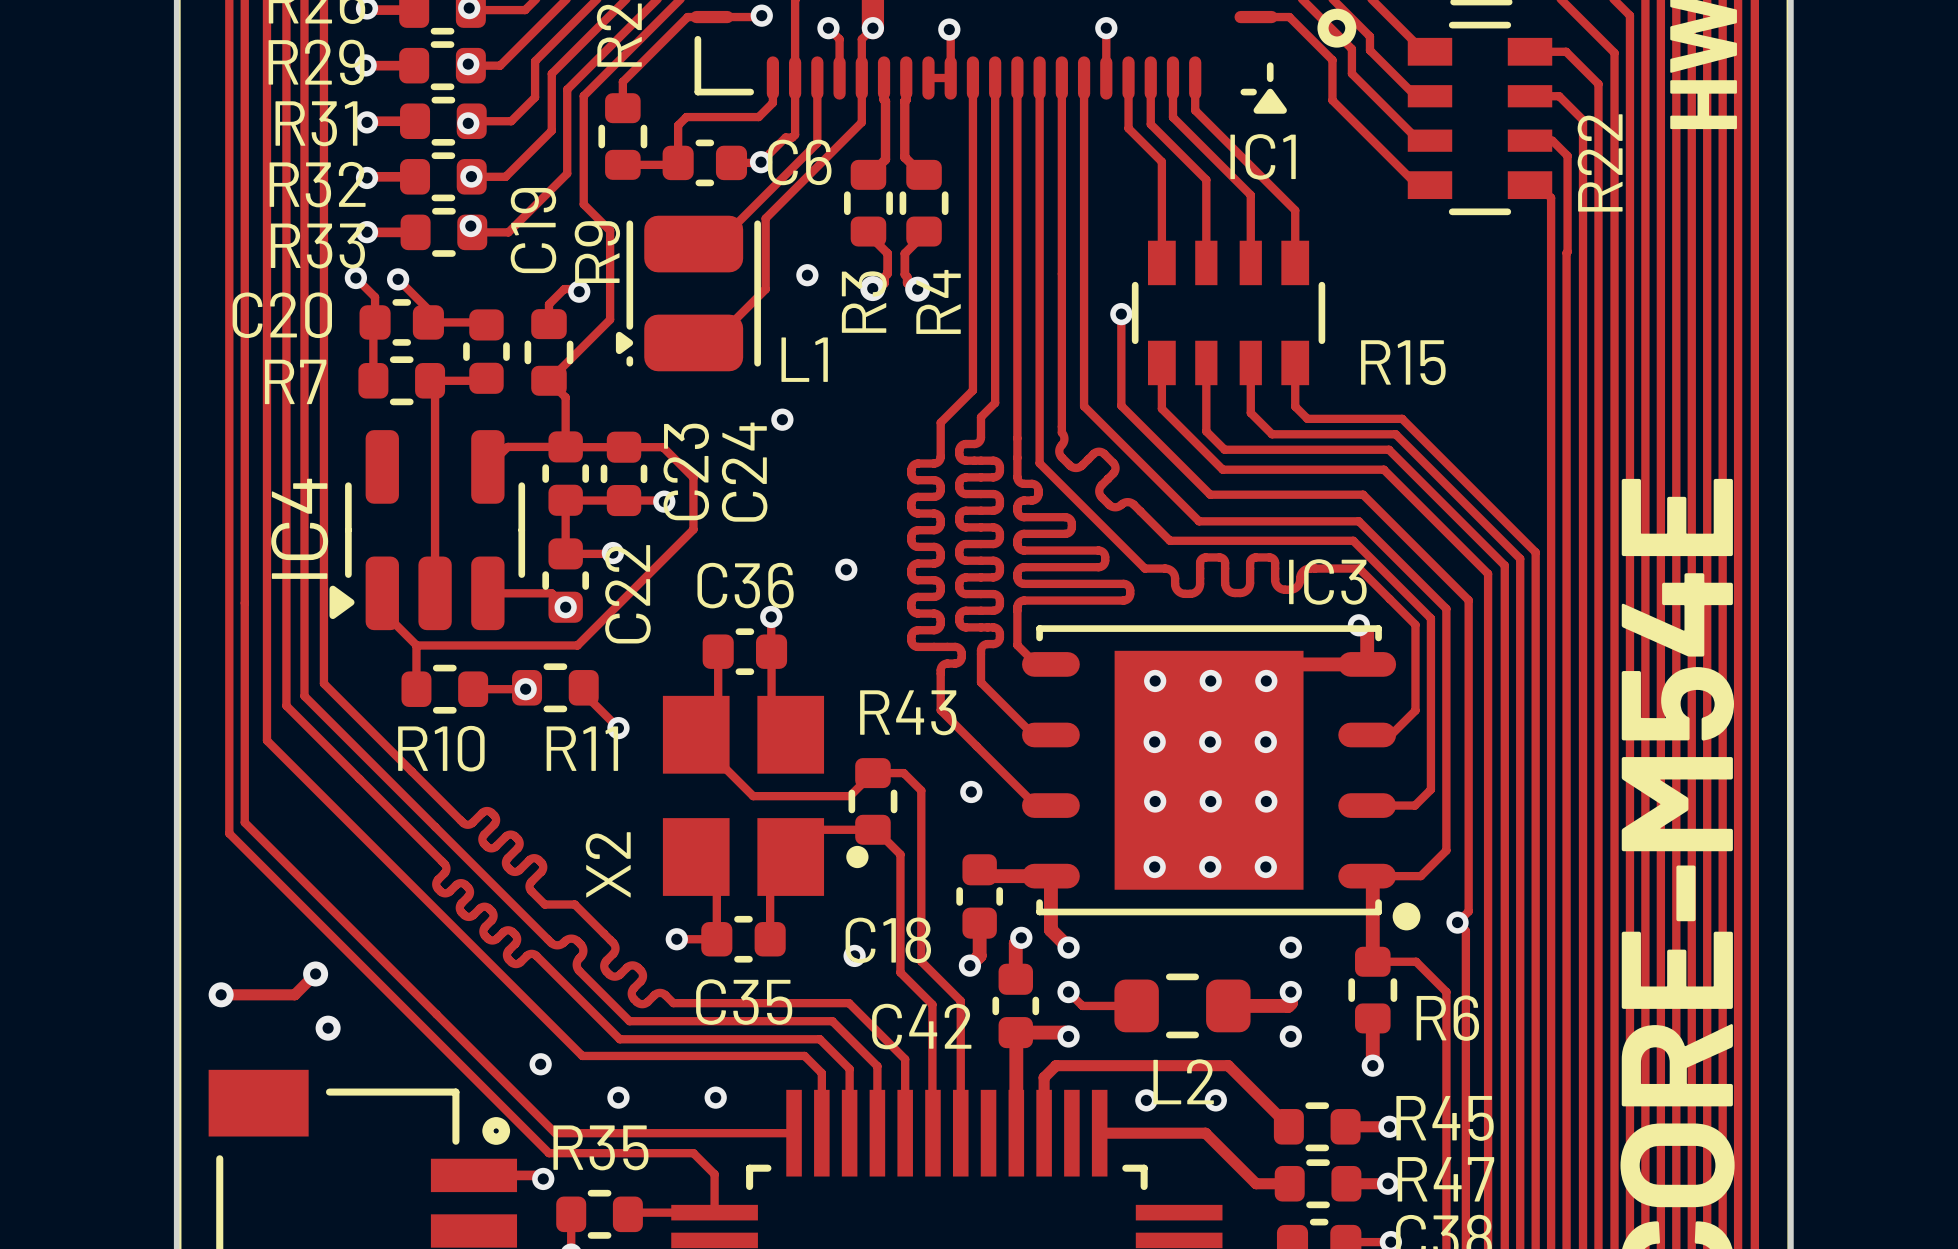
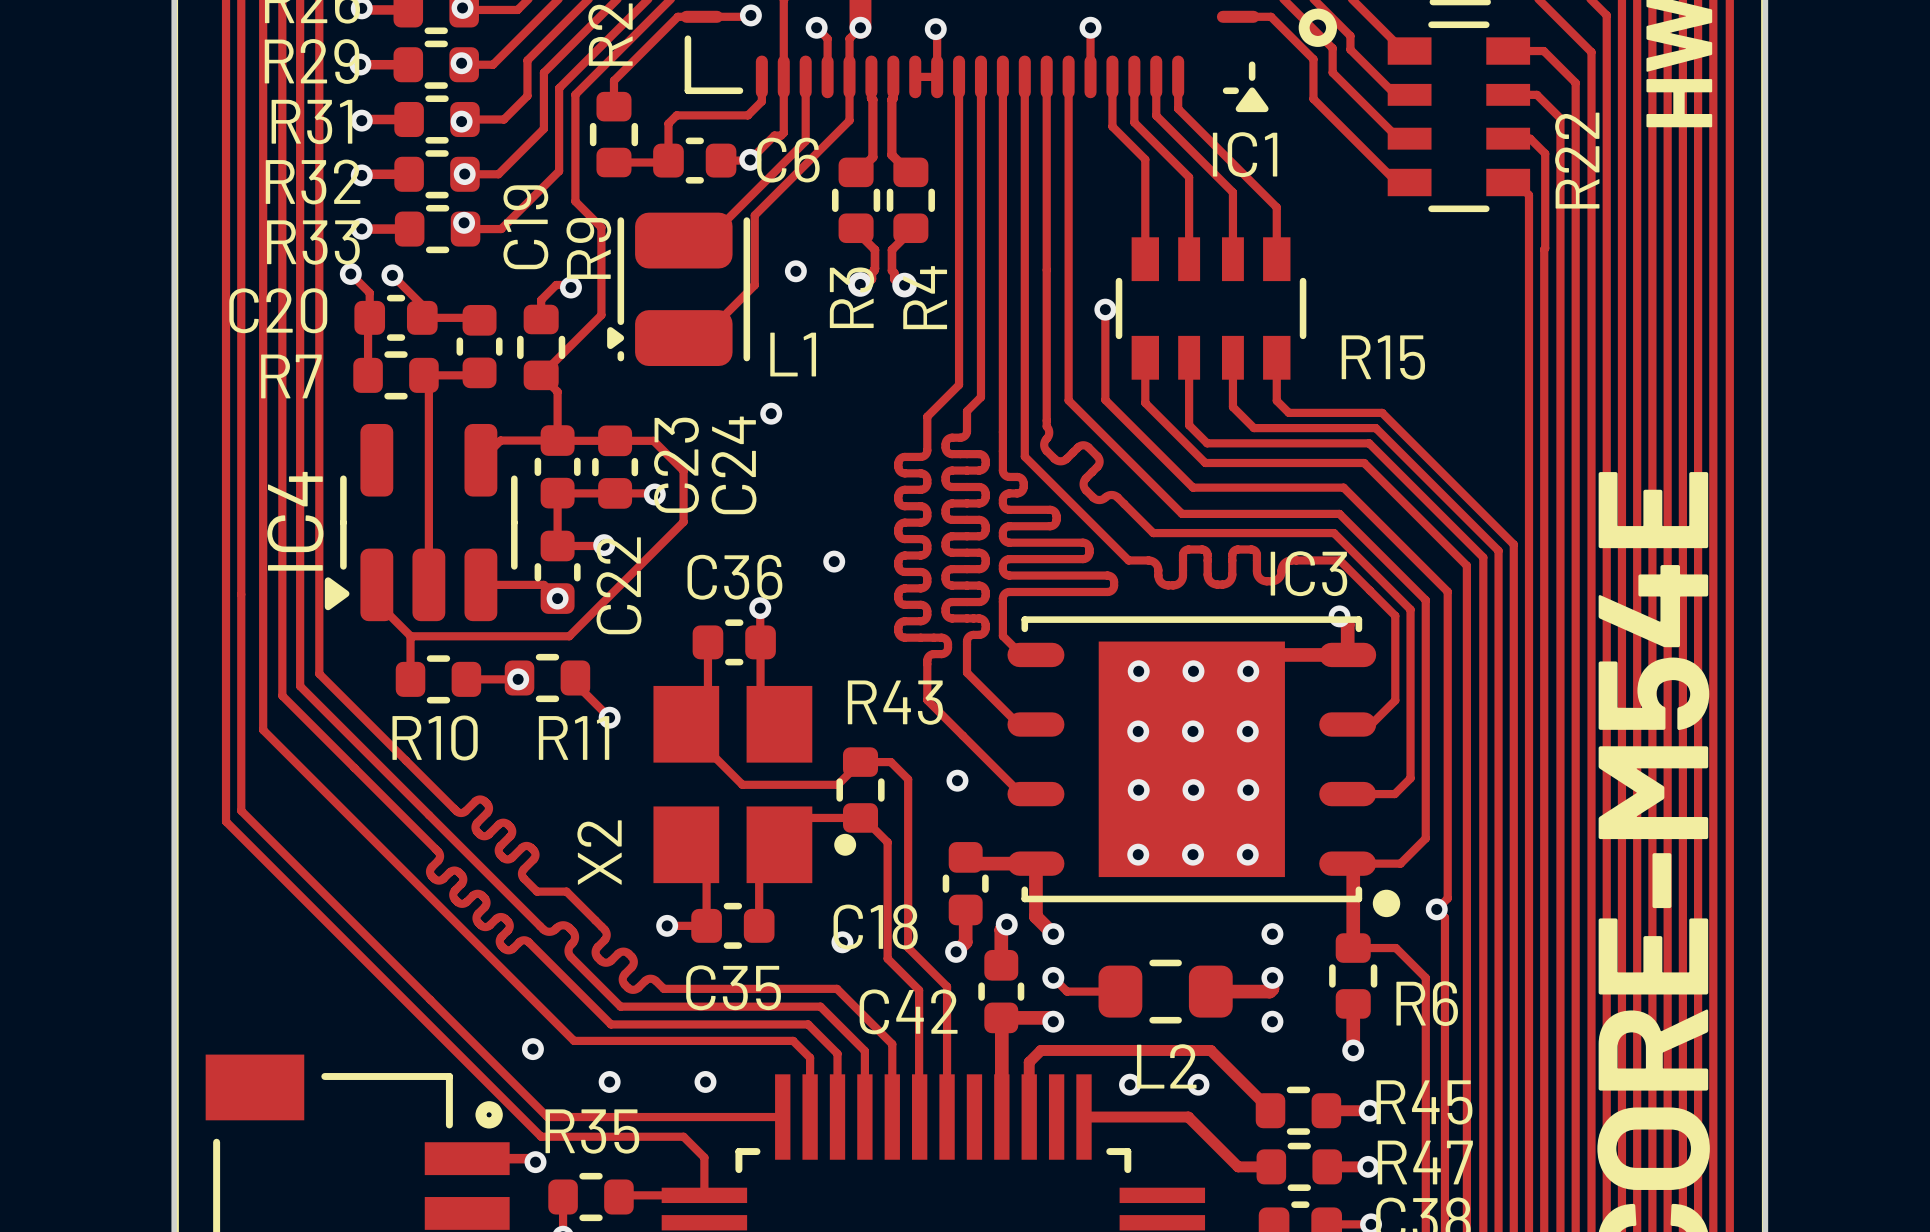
track: (315, 973) (294, 994) (221, 994) -> none
via: (315, 973) -> none
via: (221, 994) -> none
via: (328, 1028) -> none

